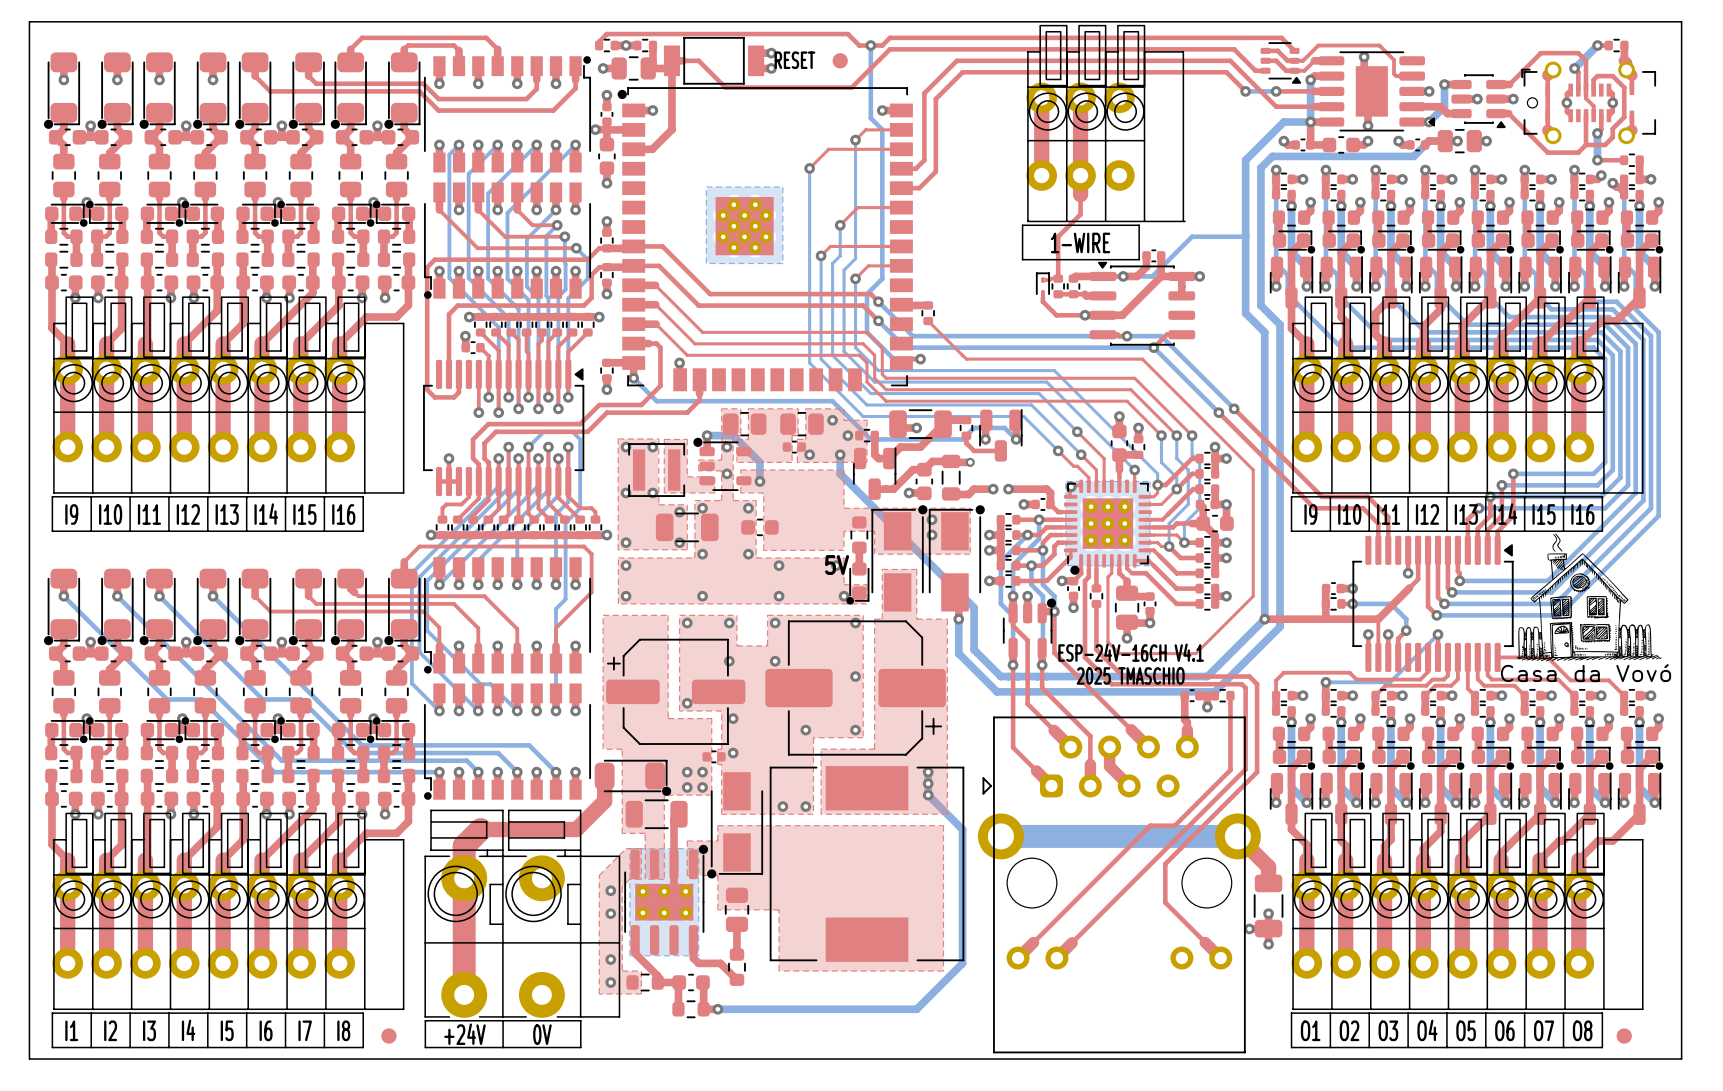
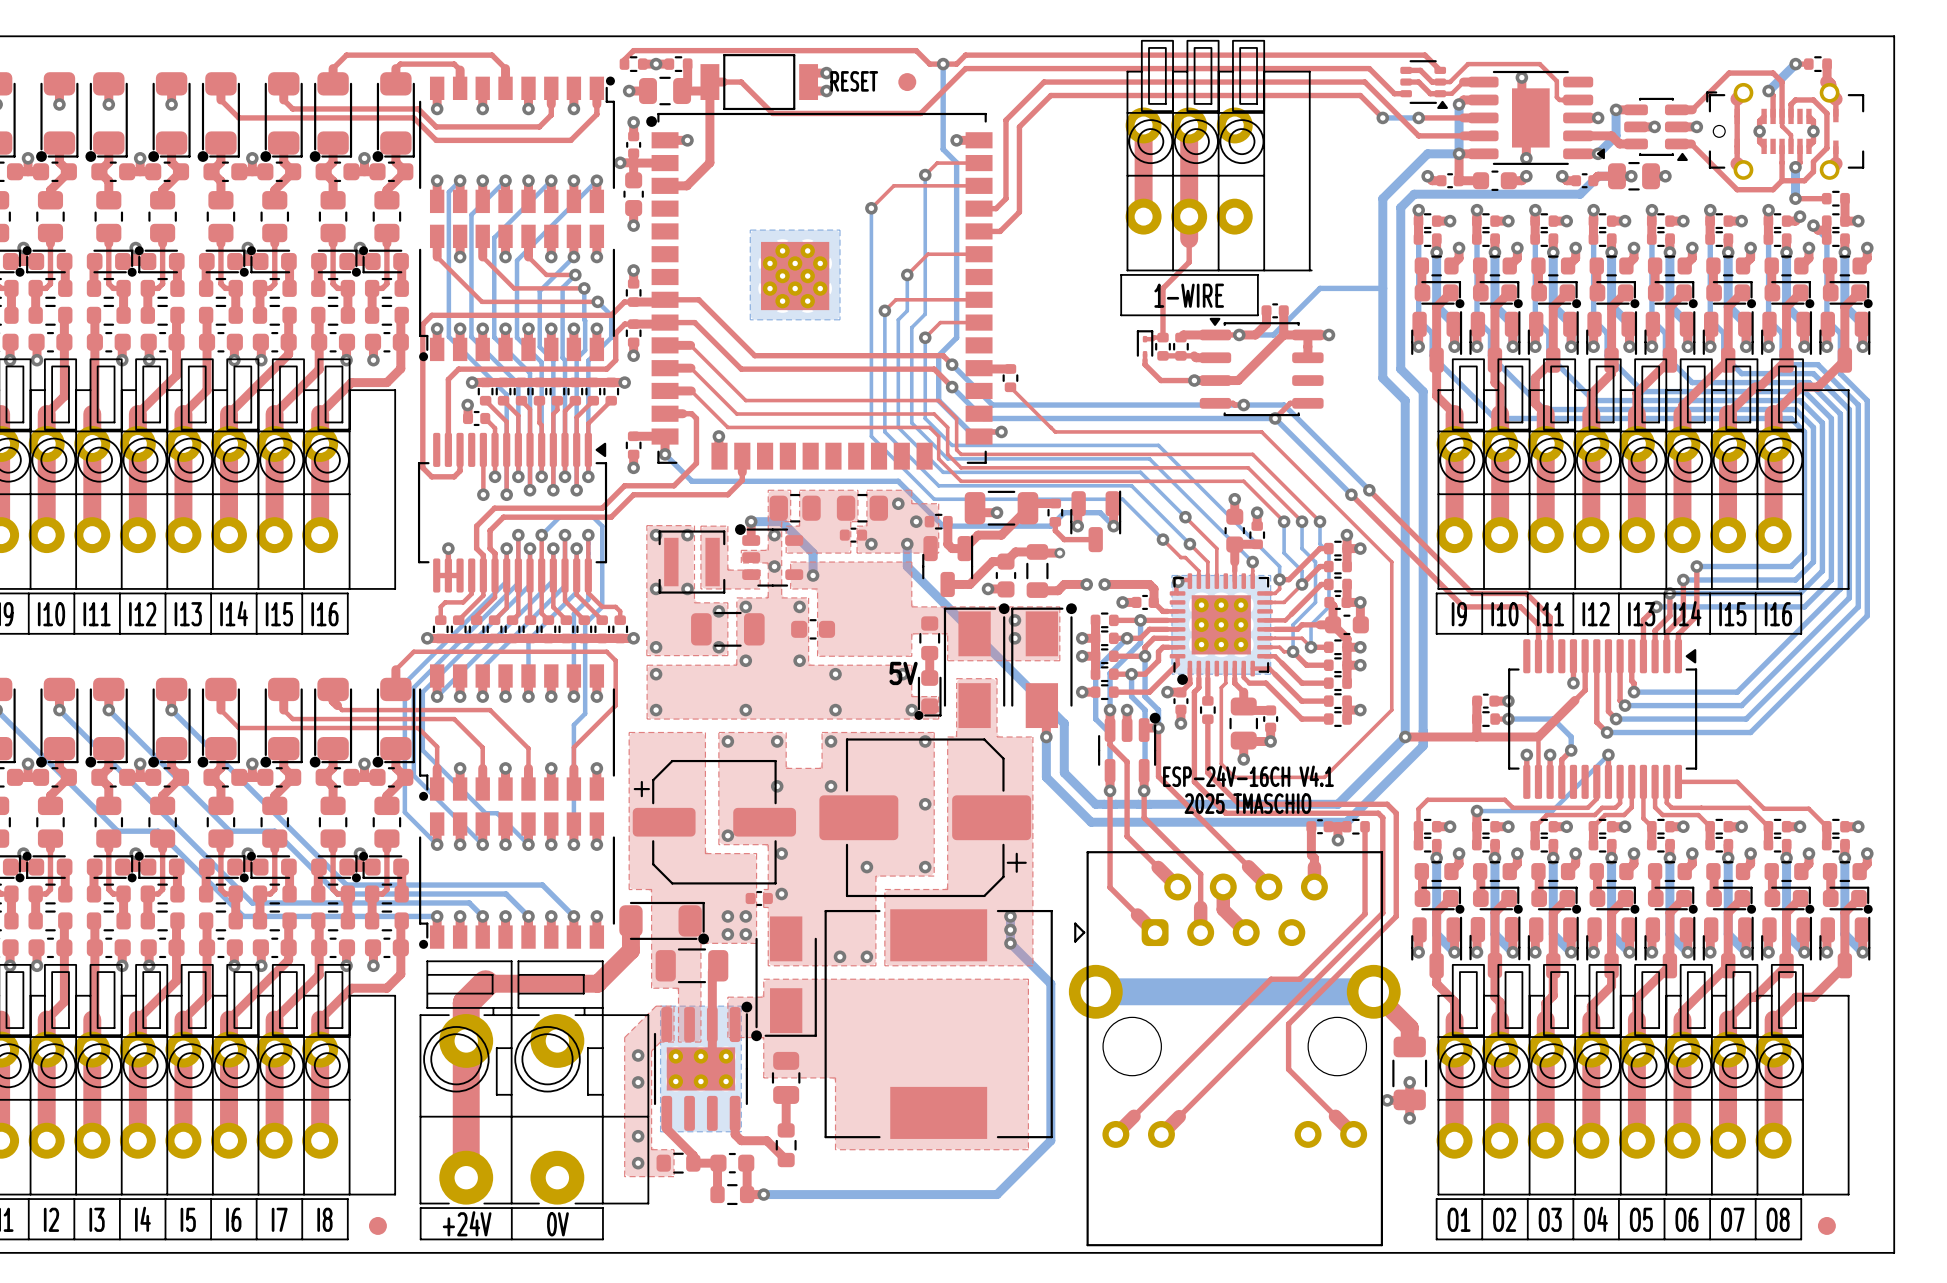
drawing: [1516, 533, 1662, 662] -> none
text: Casa da Vovó (1586, 673) -> none

